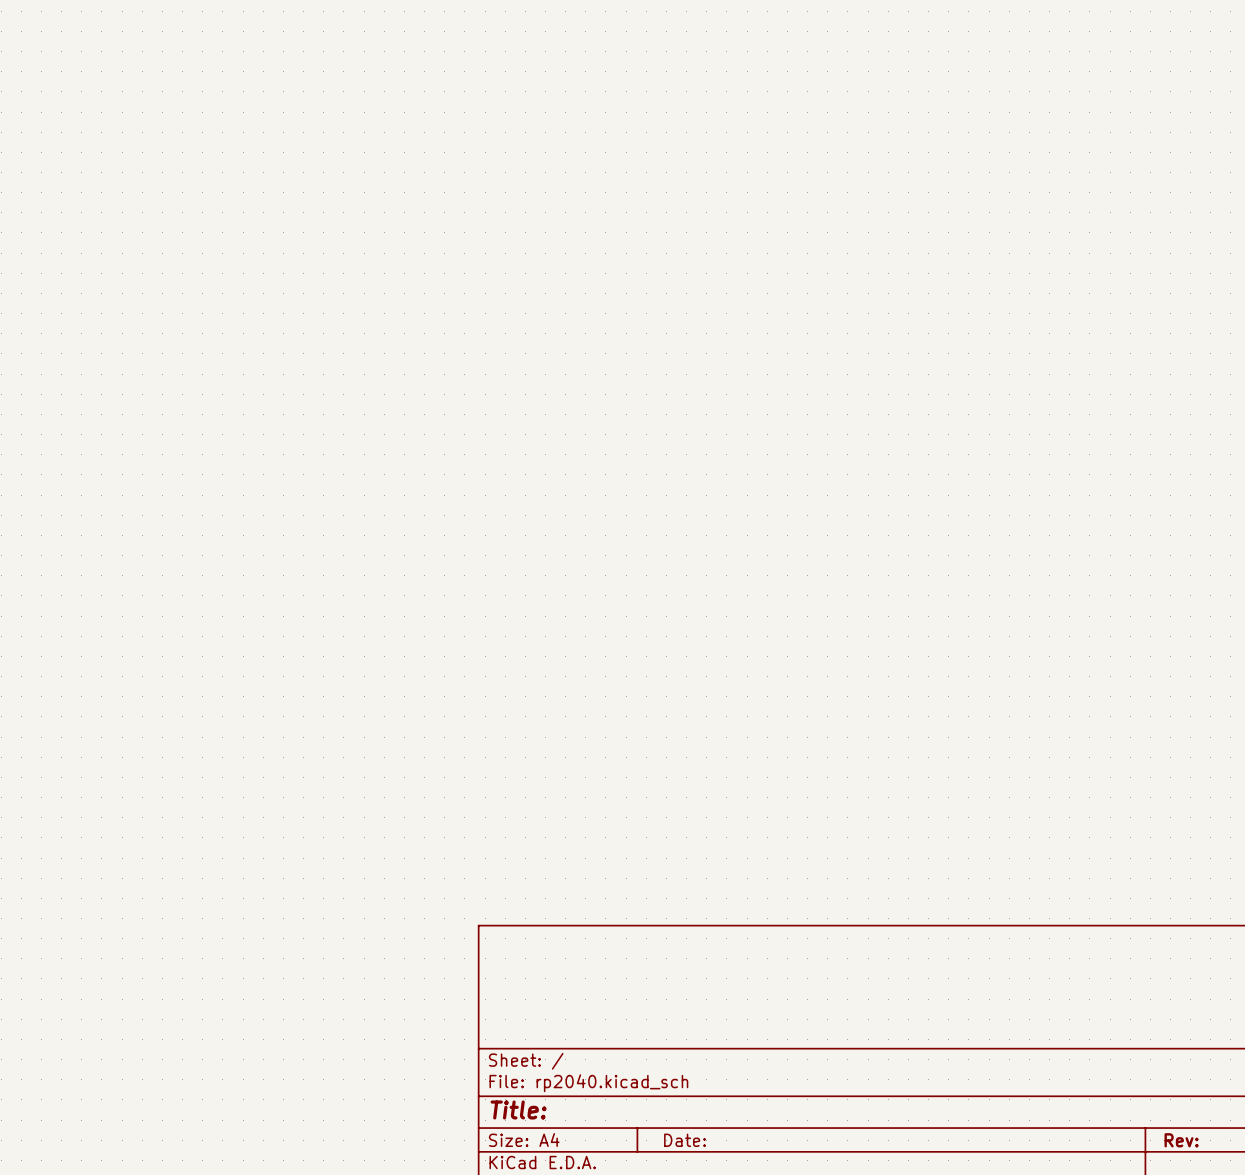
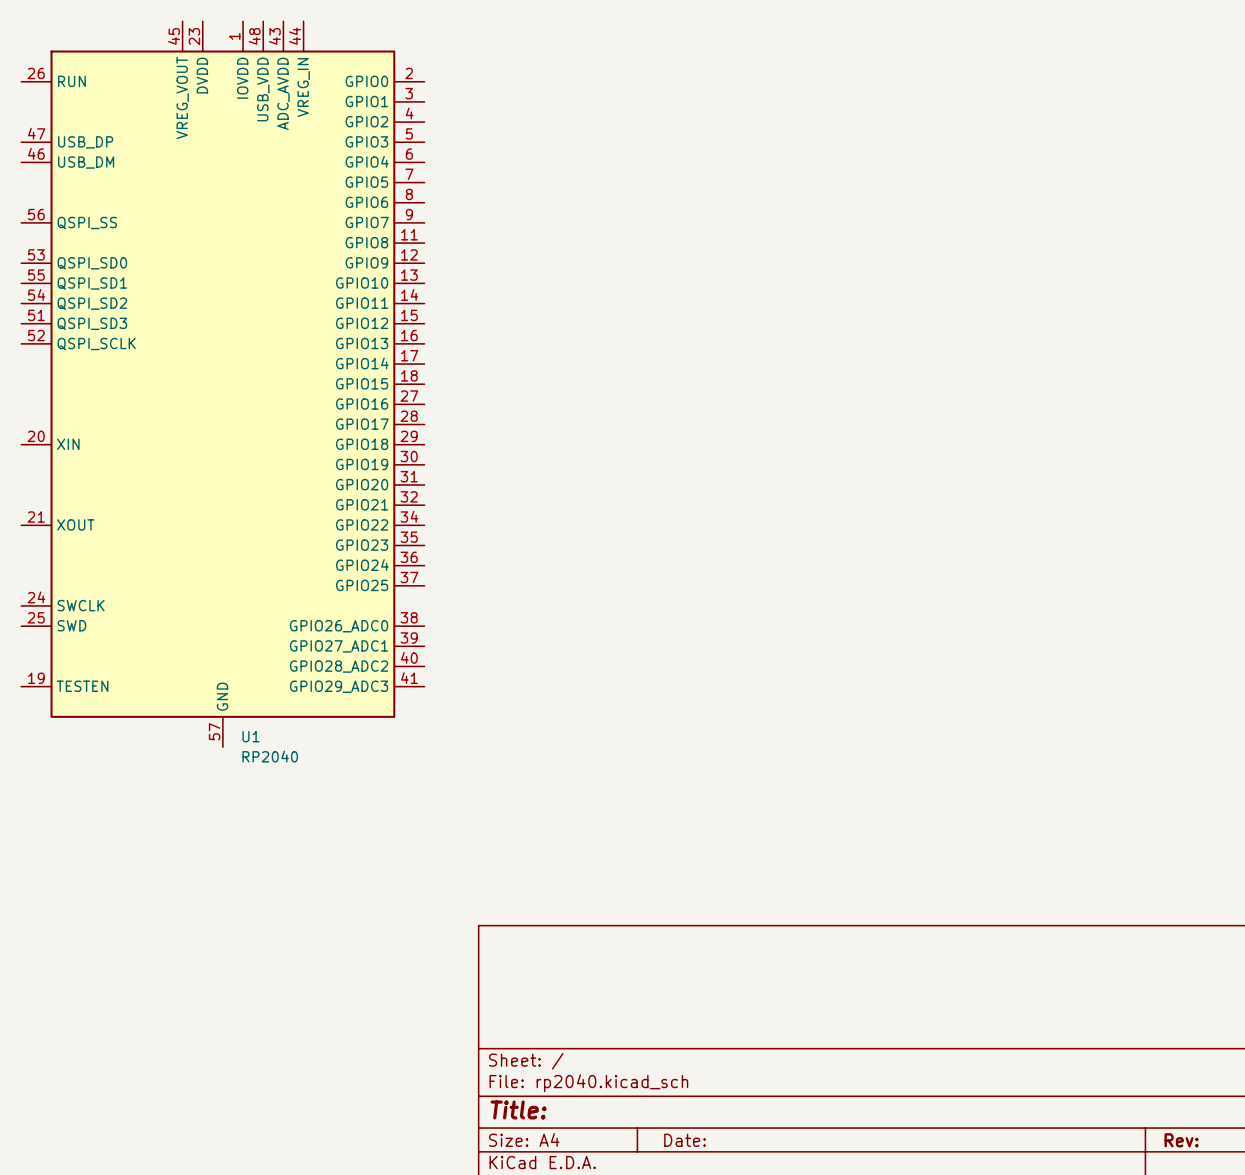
U1: none -> RP2040 (222, 384)

